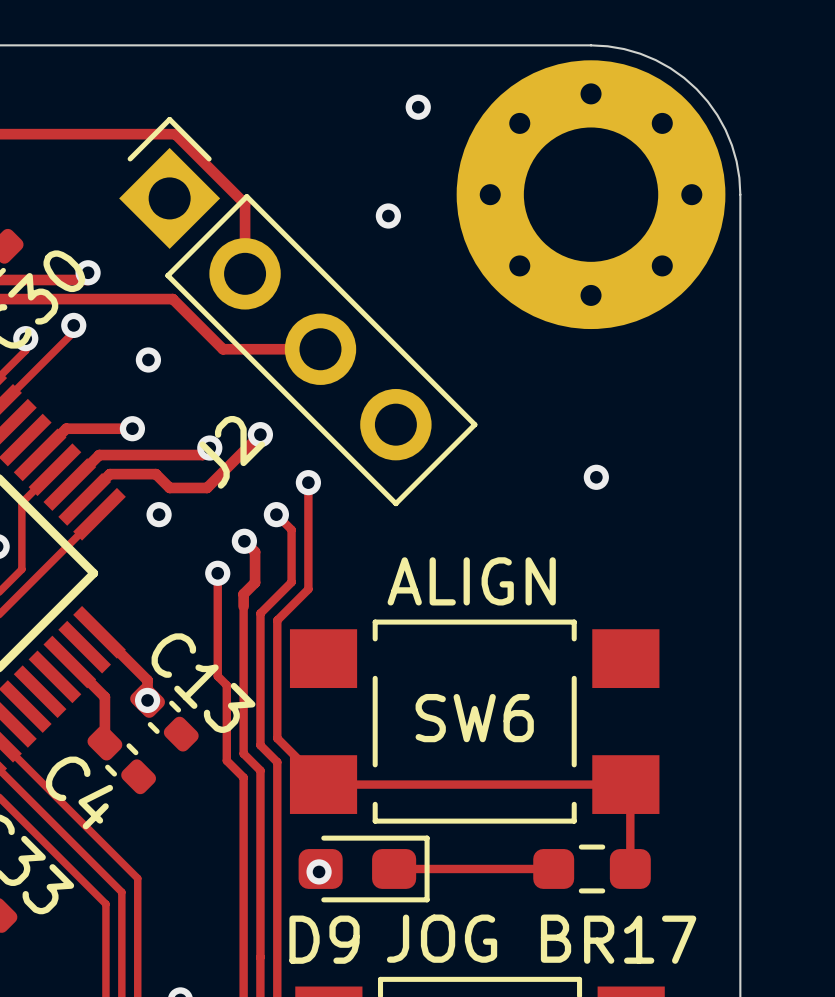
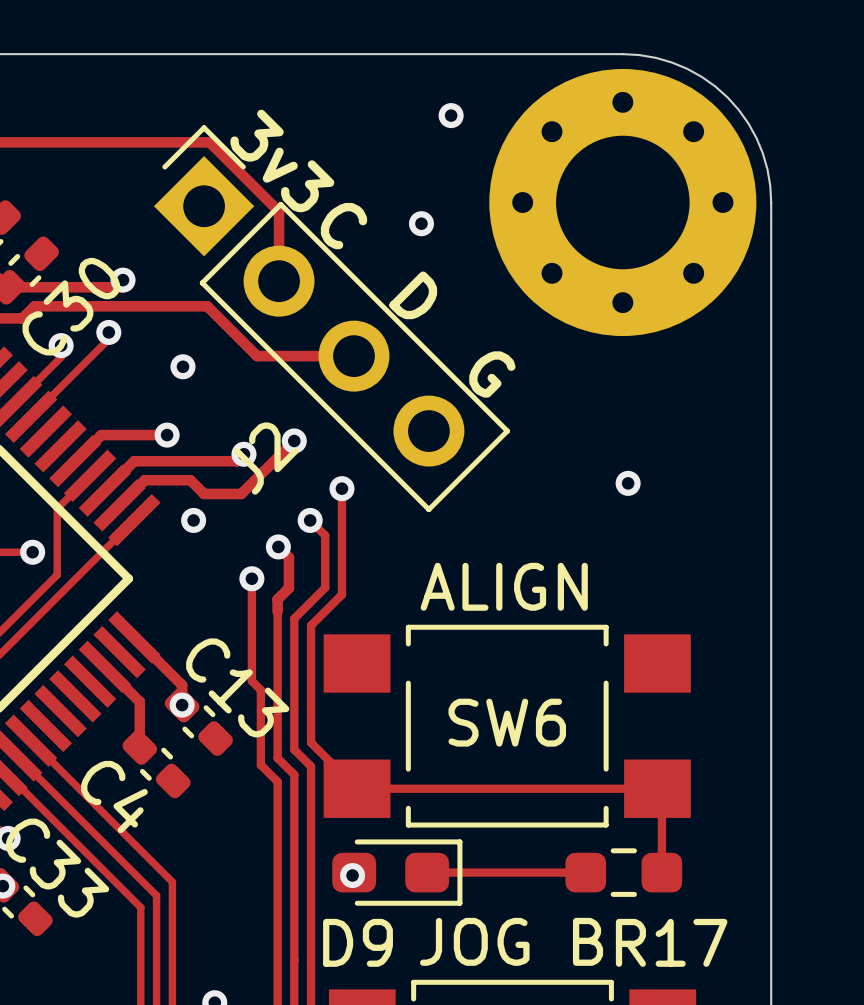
text: none -> 3v3 (282, 160)
text: none -> C (343, 226)
text: none -> D (413, 295)
text: none -> G (492, 374)

